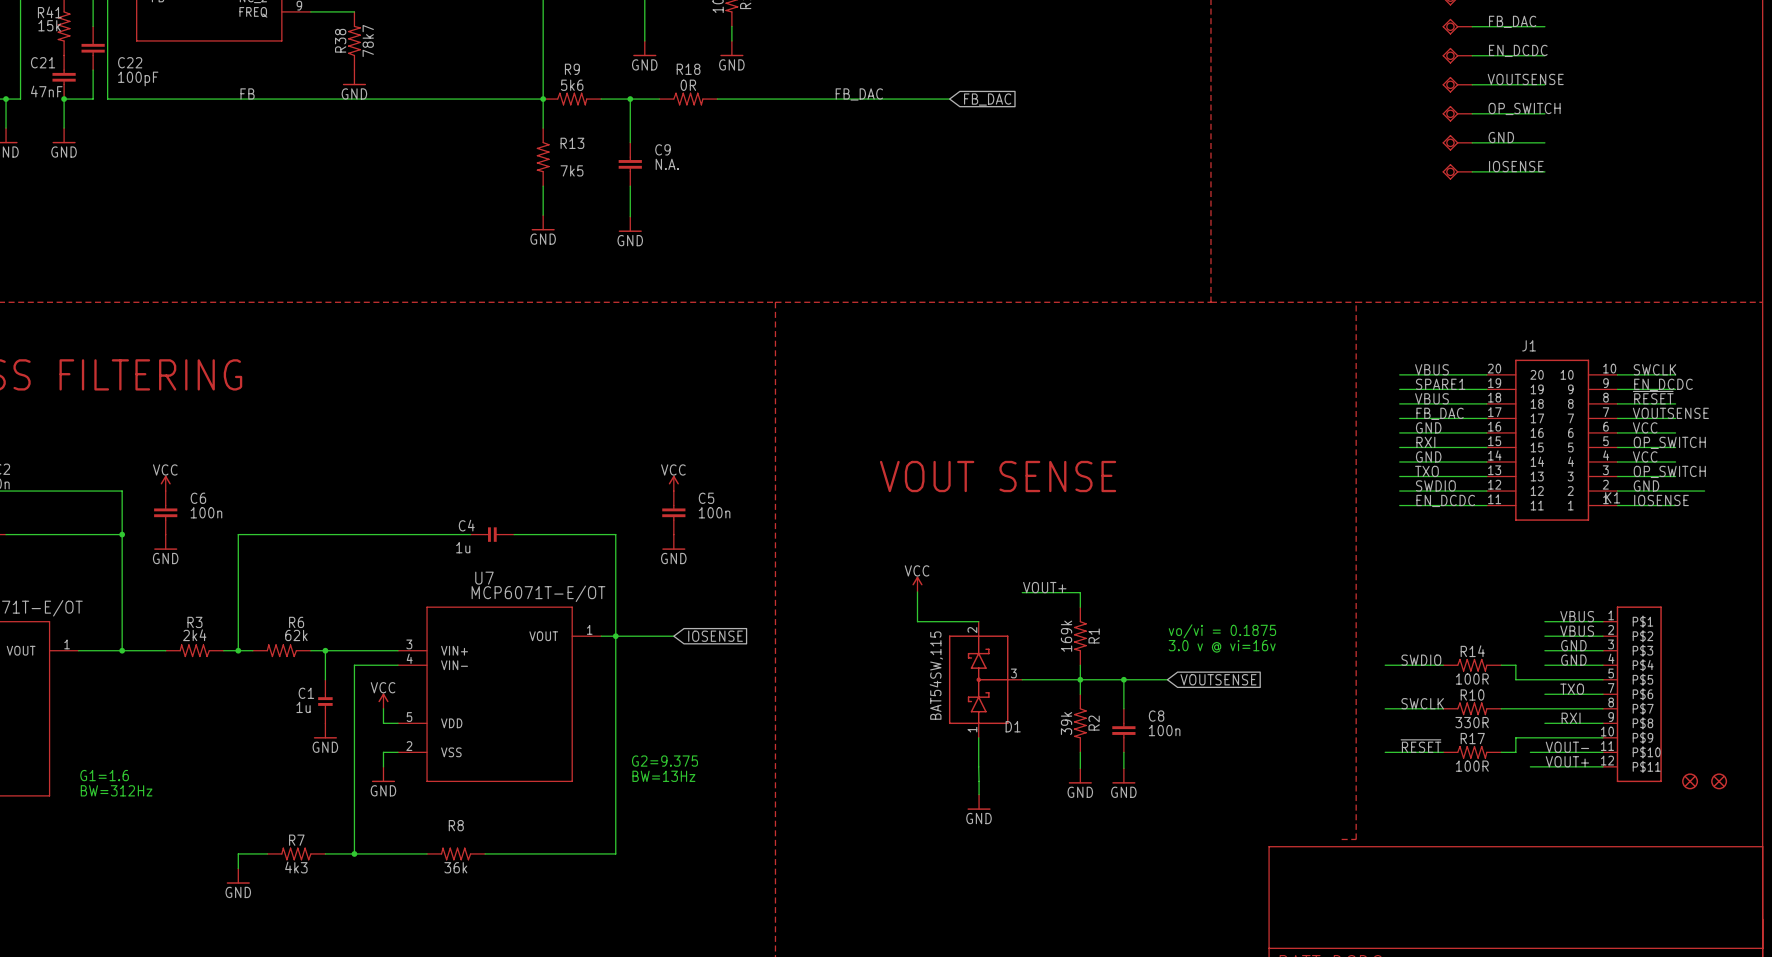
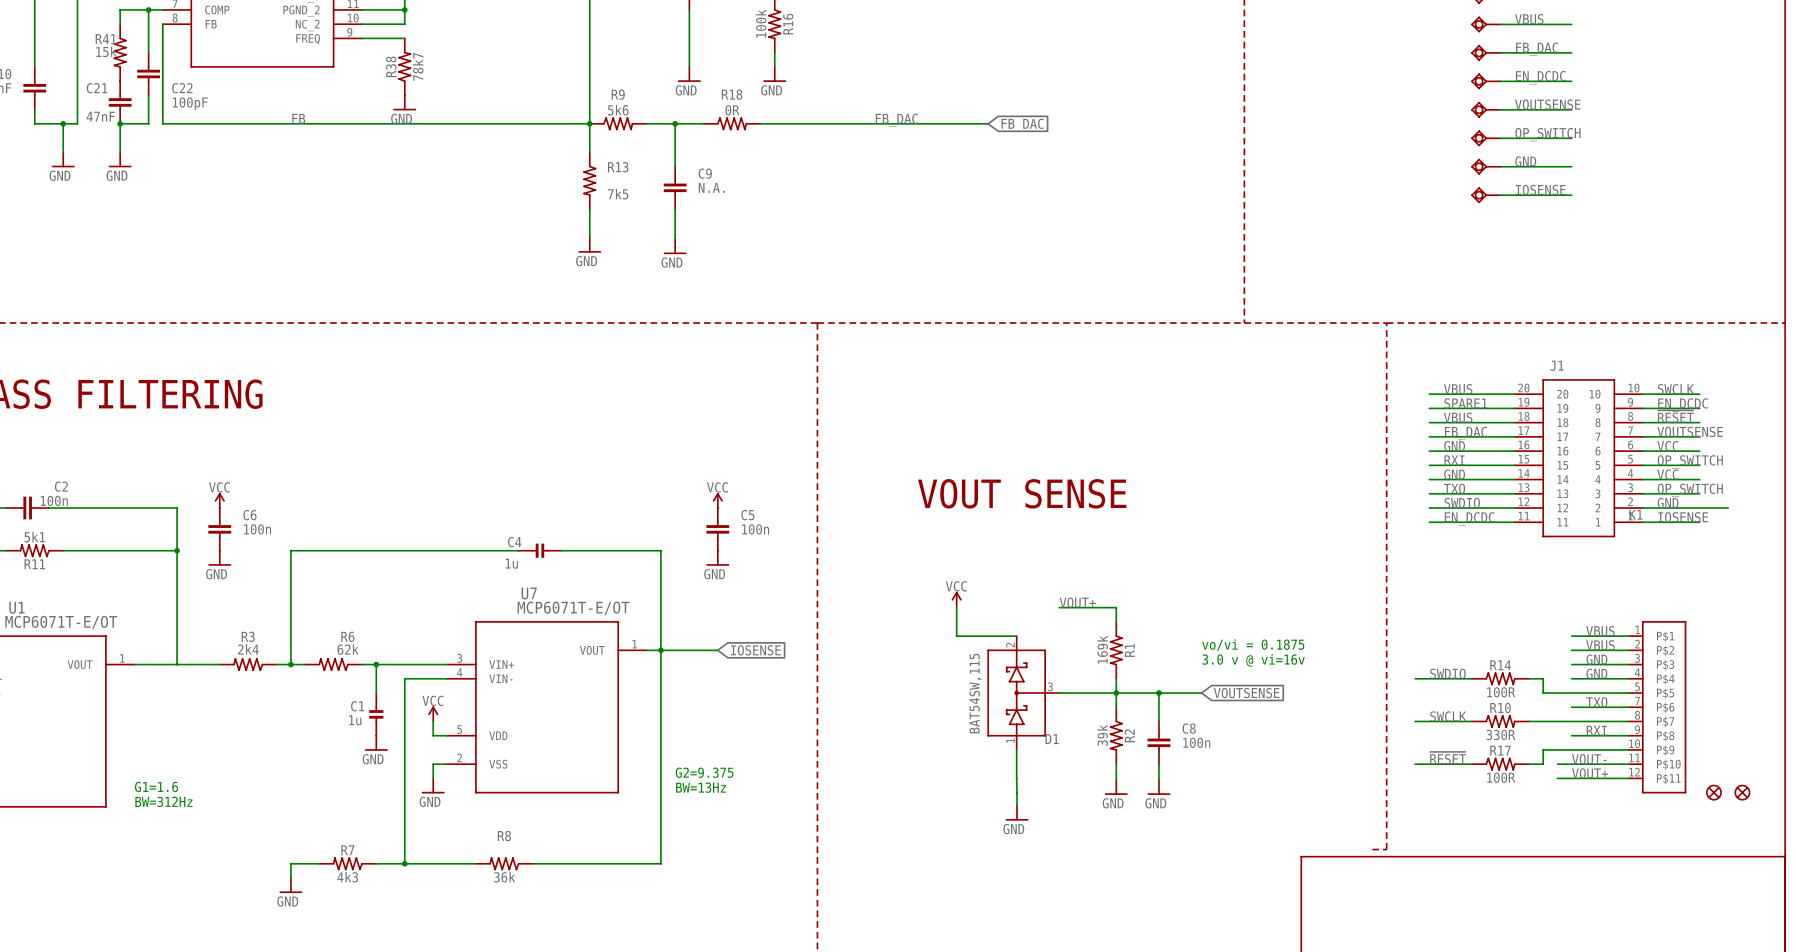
junction: (122, 650) -> none

